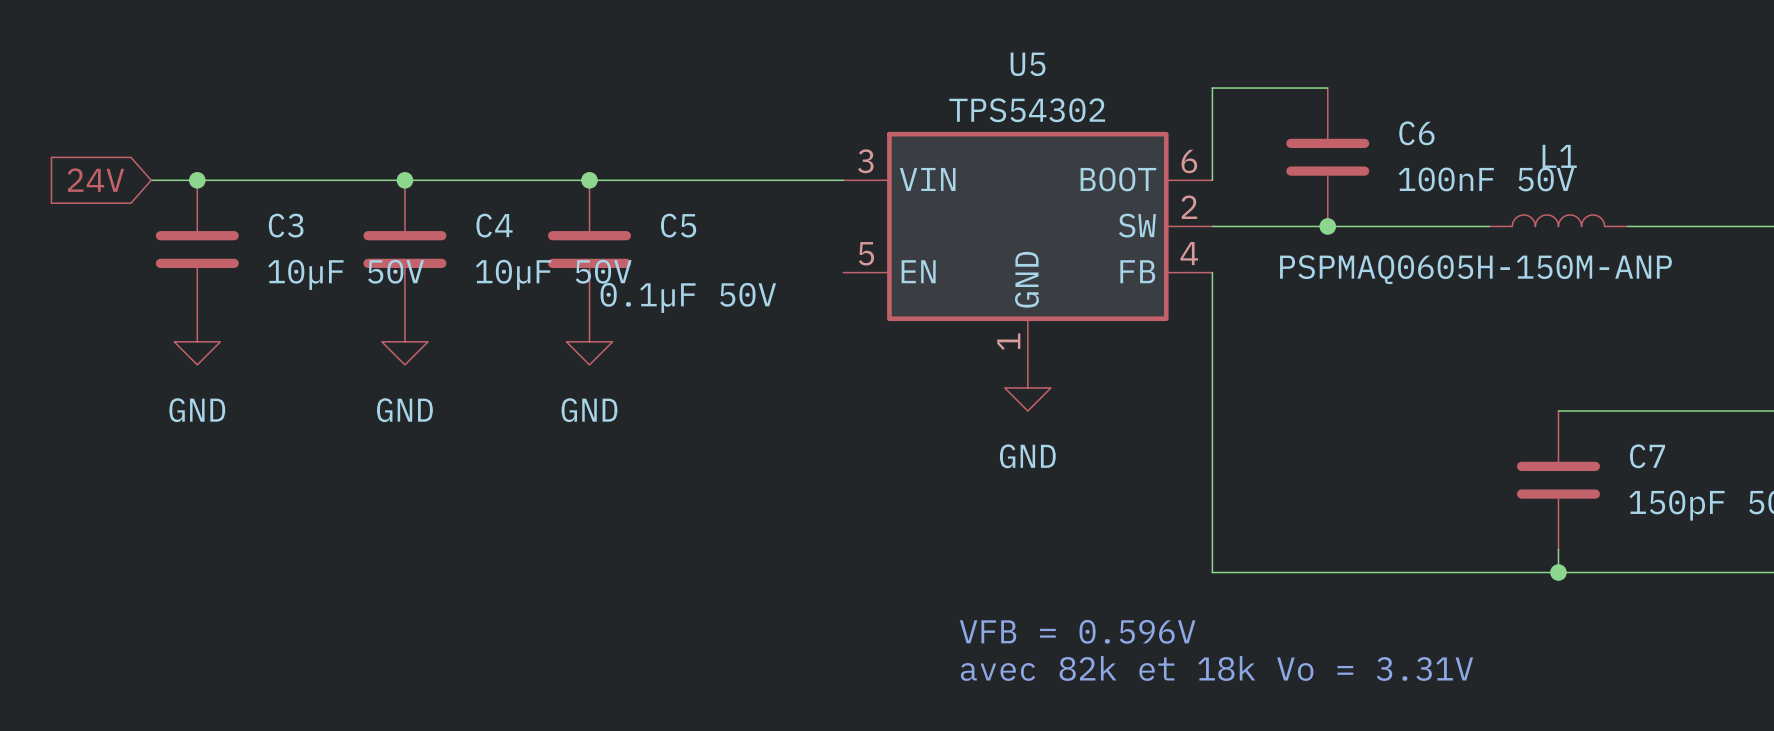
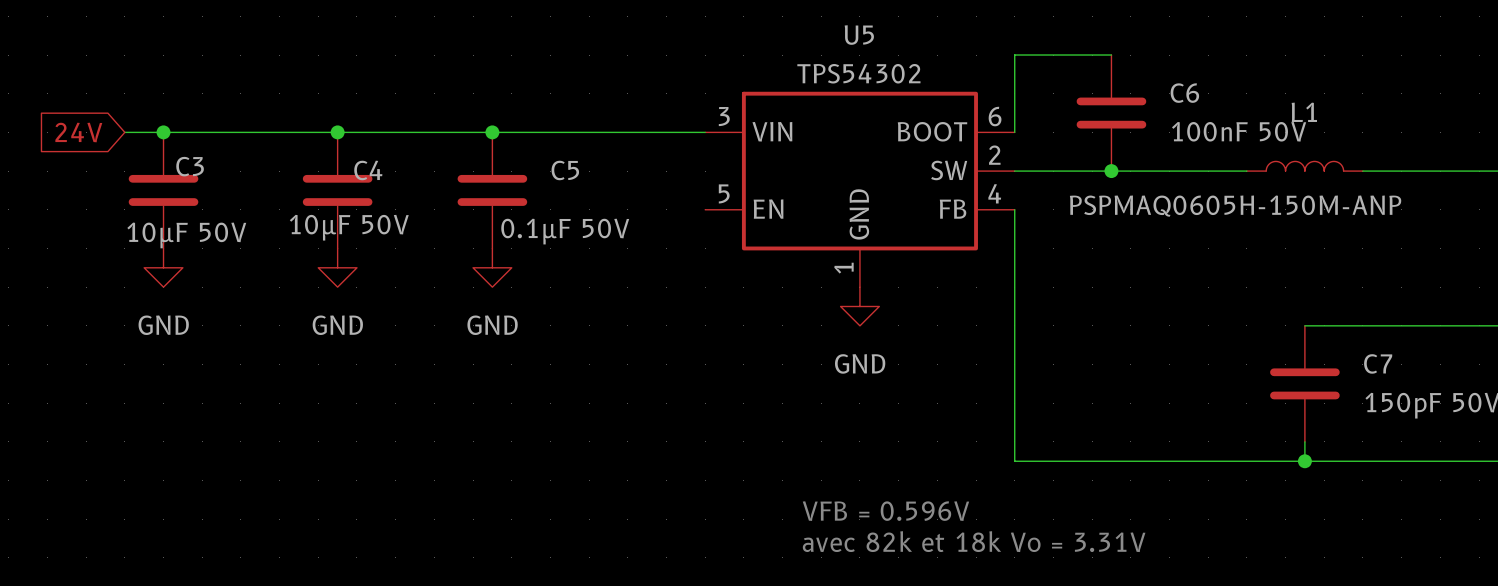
C3 name position: C3 (286, 225) -> C3 (190, 166)
C4 name position: C4 (494, 225) -> C4 (368, 170)
C3 value position: 10µF 50V (346, 274) -> 10µF 50V (186, 235)
C4 value position: 10µF 50V (553, 274) -> 10µF 50V (349, 227)

